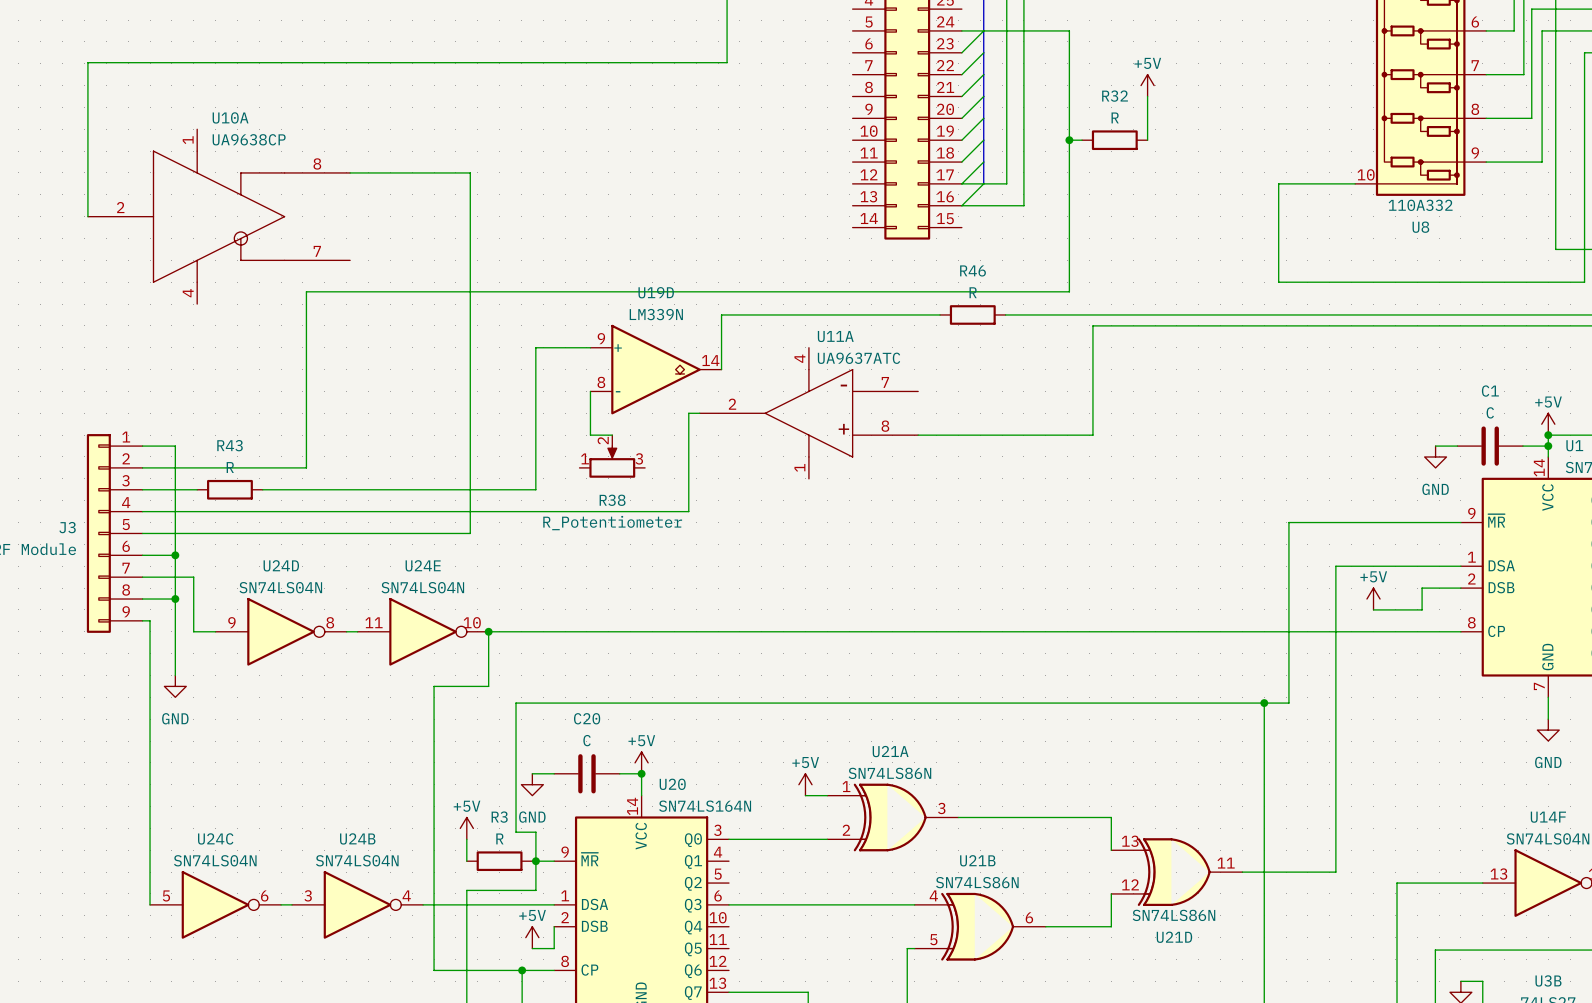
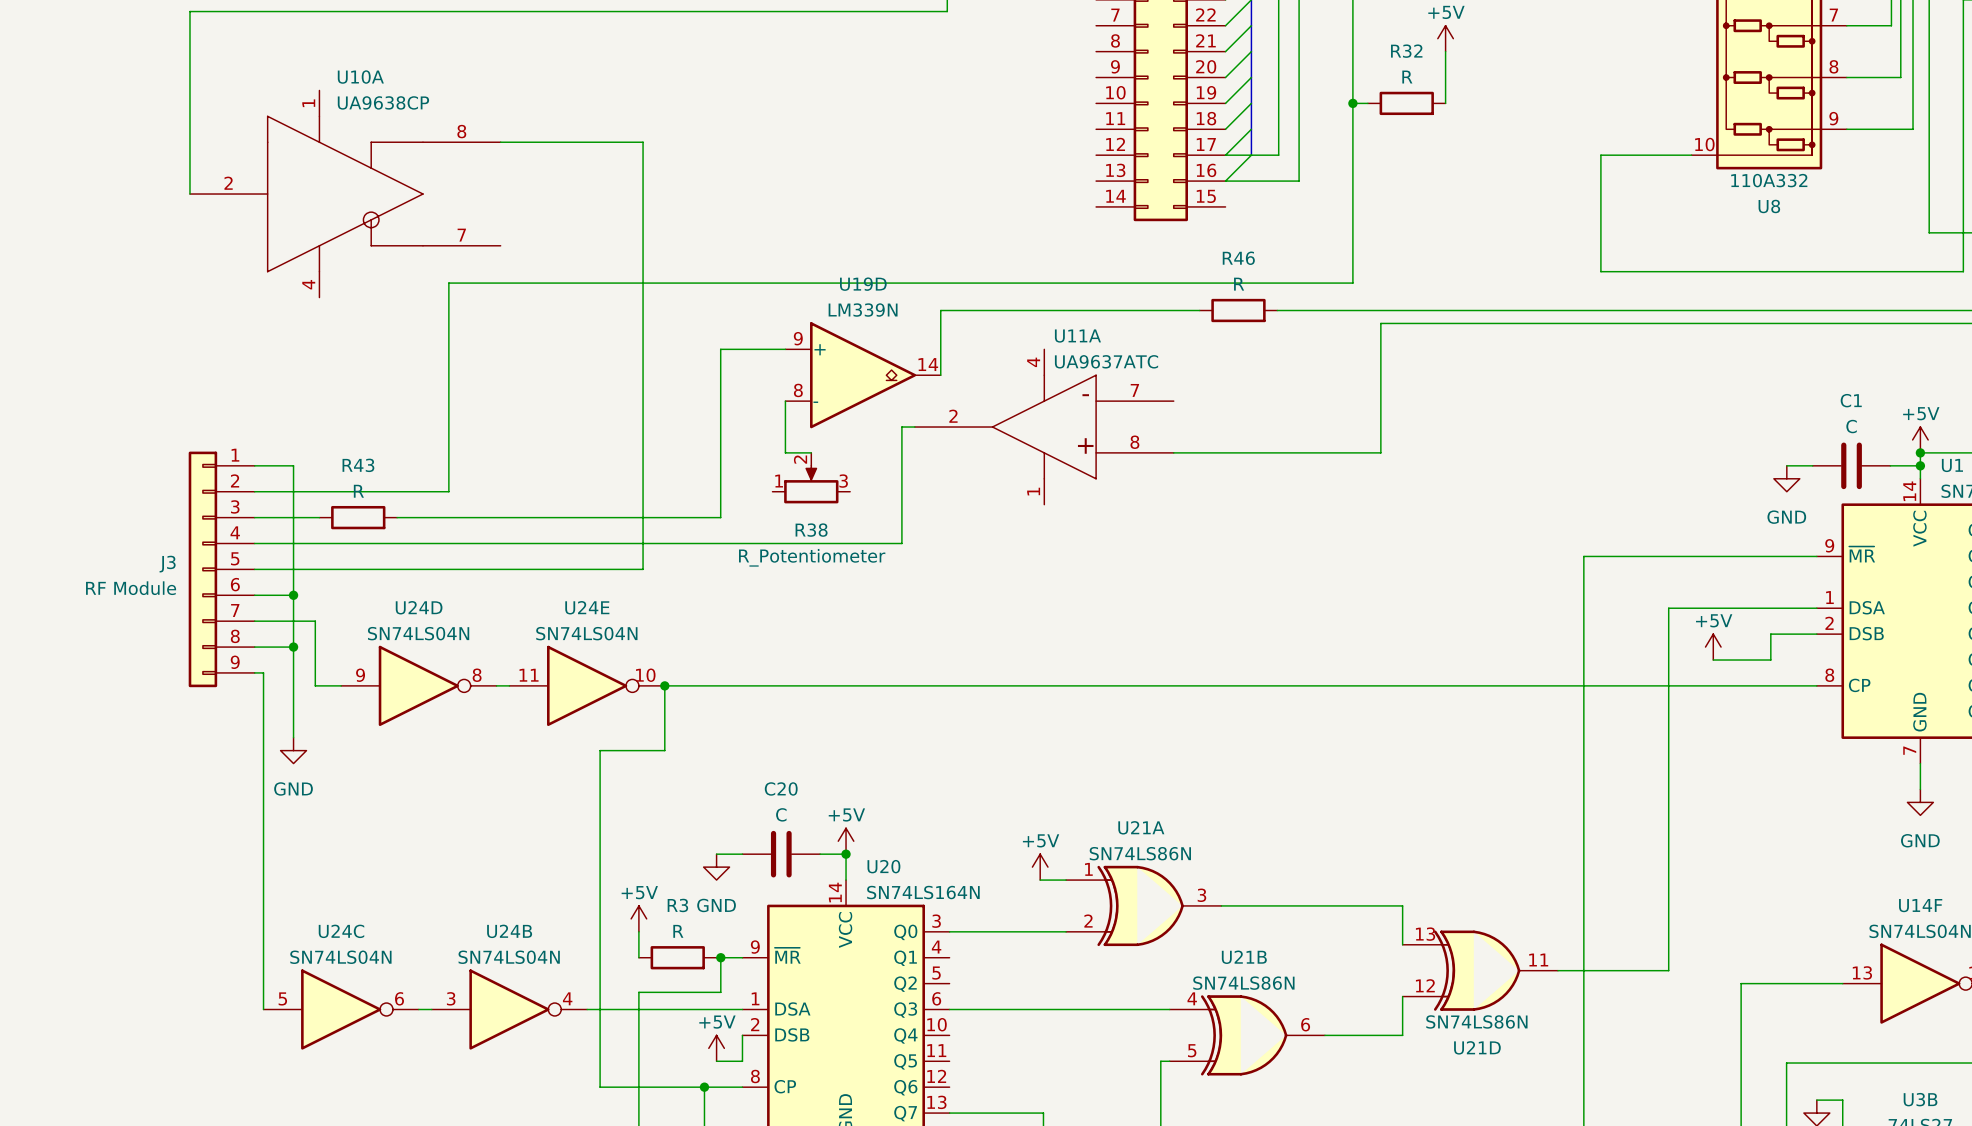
wire: (1288, 522) (1288, 703) (516, 703) (516, 832) (535, 832) (535, 861) -> (1613, 556) (1583, 556) (1583, 770)
junction: (1264, 703) -> none

